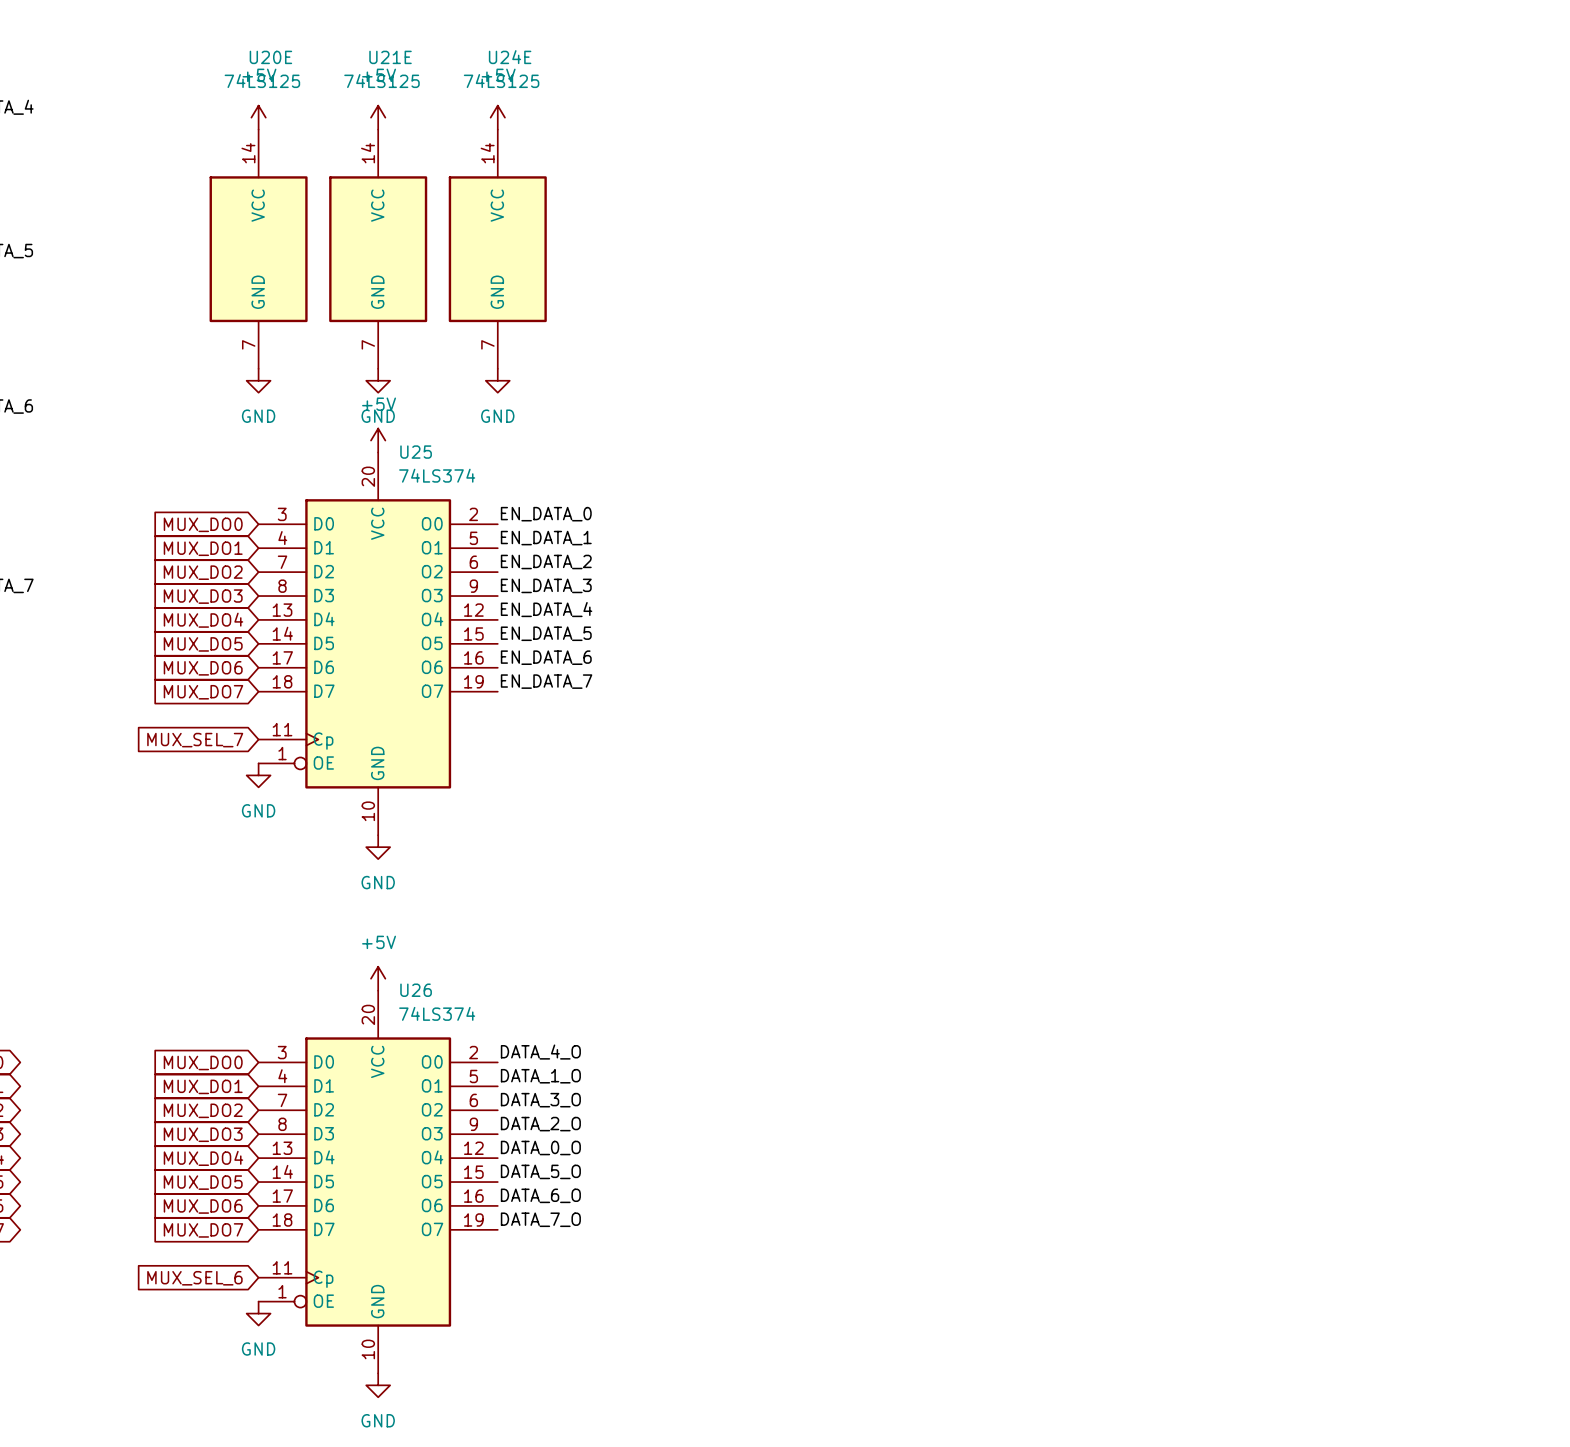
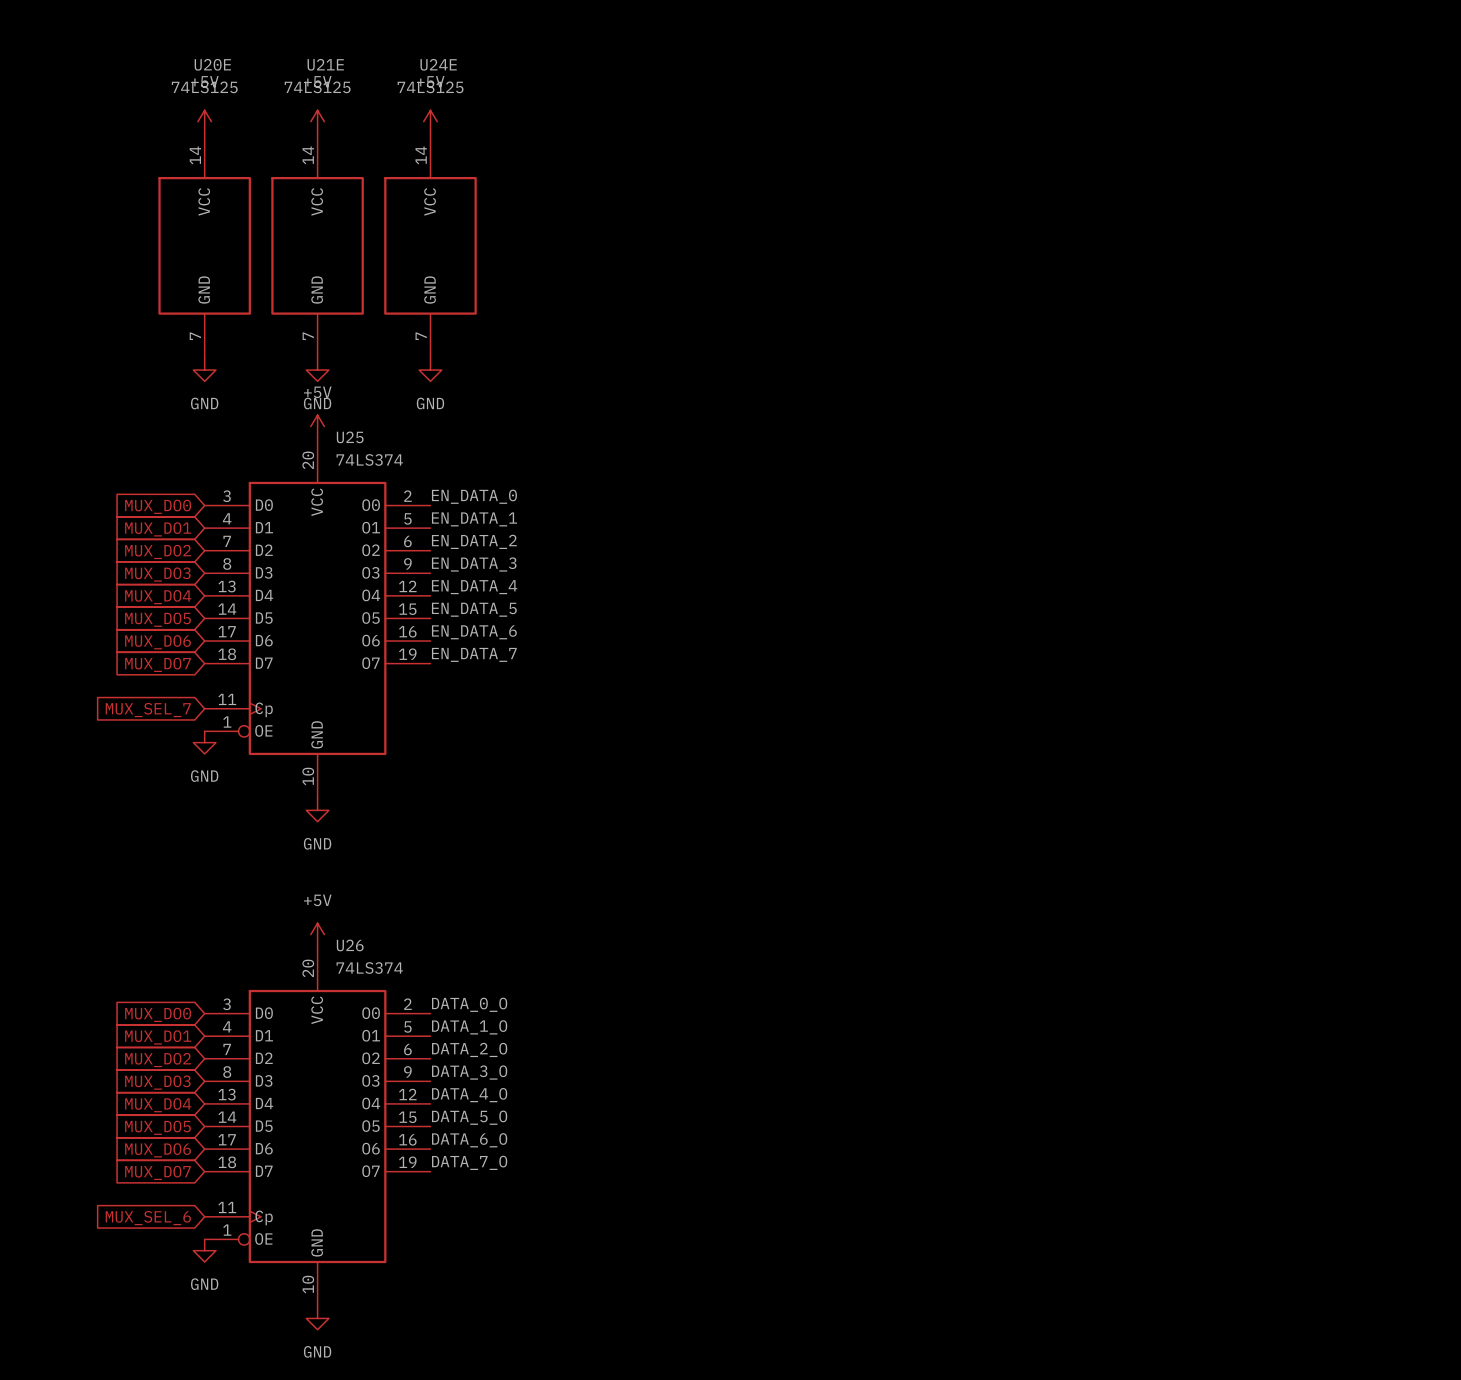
label: DATA_4_O (540, 1052) -> DATA_0_O (469, 1004)
label: DATA_3_O (540, 1100) -> DATA_2_O (469, 1049)
label: DATA_2_O (540, 1124) -> DATA_3_O (469, 1072)
label: DATA_0_O (540, 1148) -> DATA_4_O (469, 1095)

